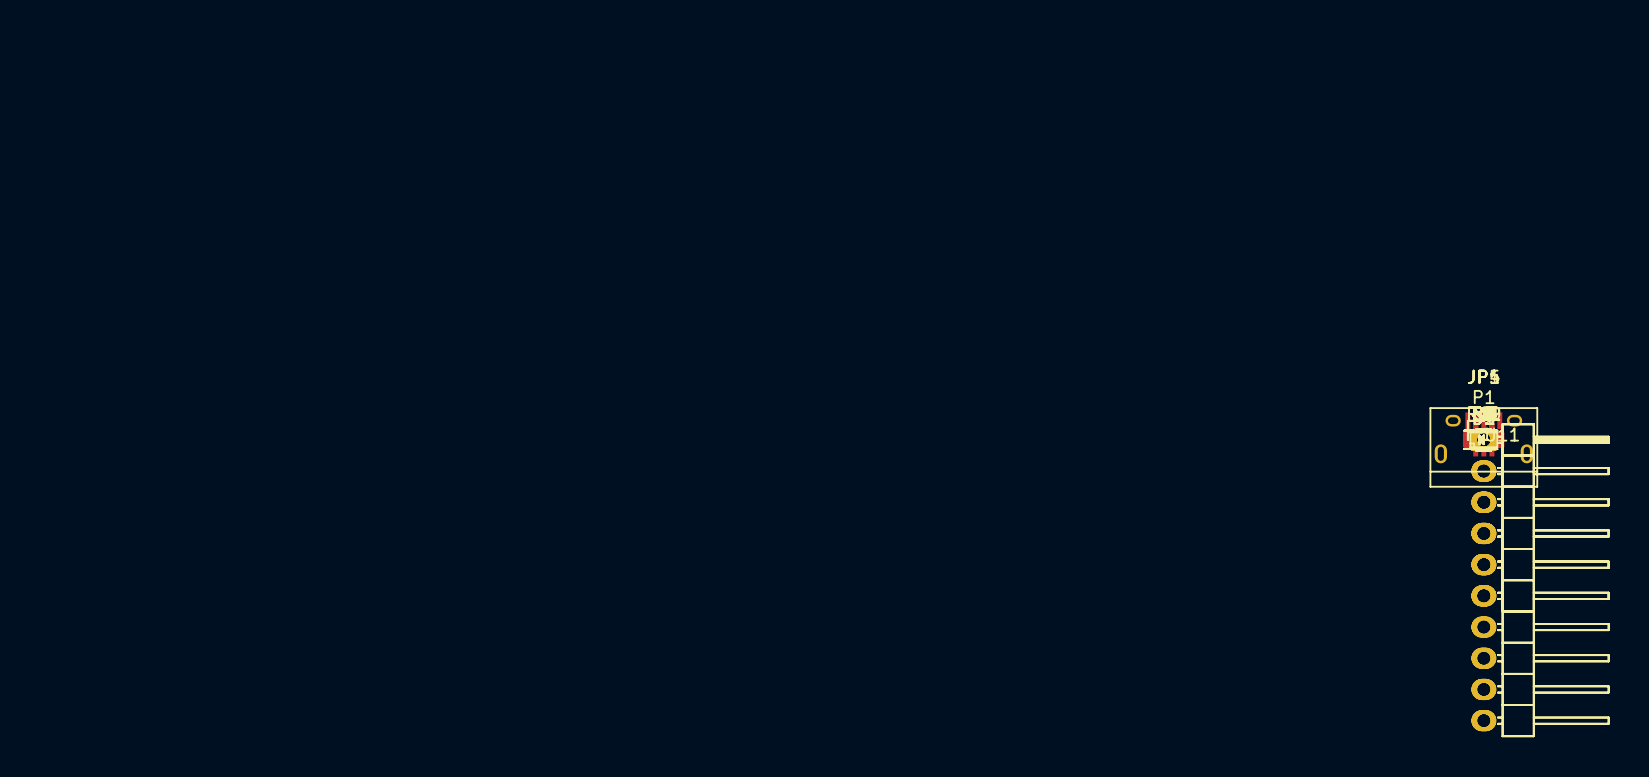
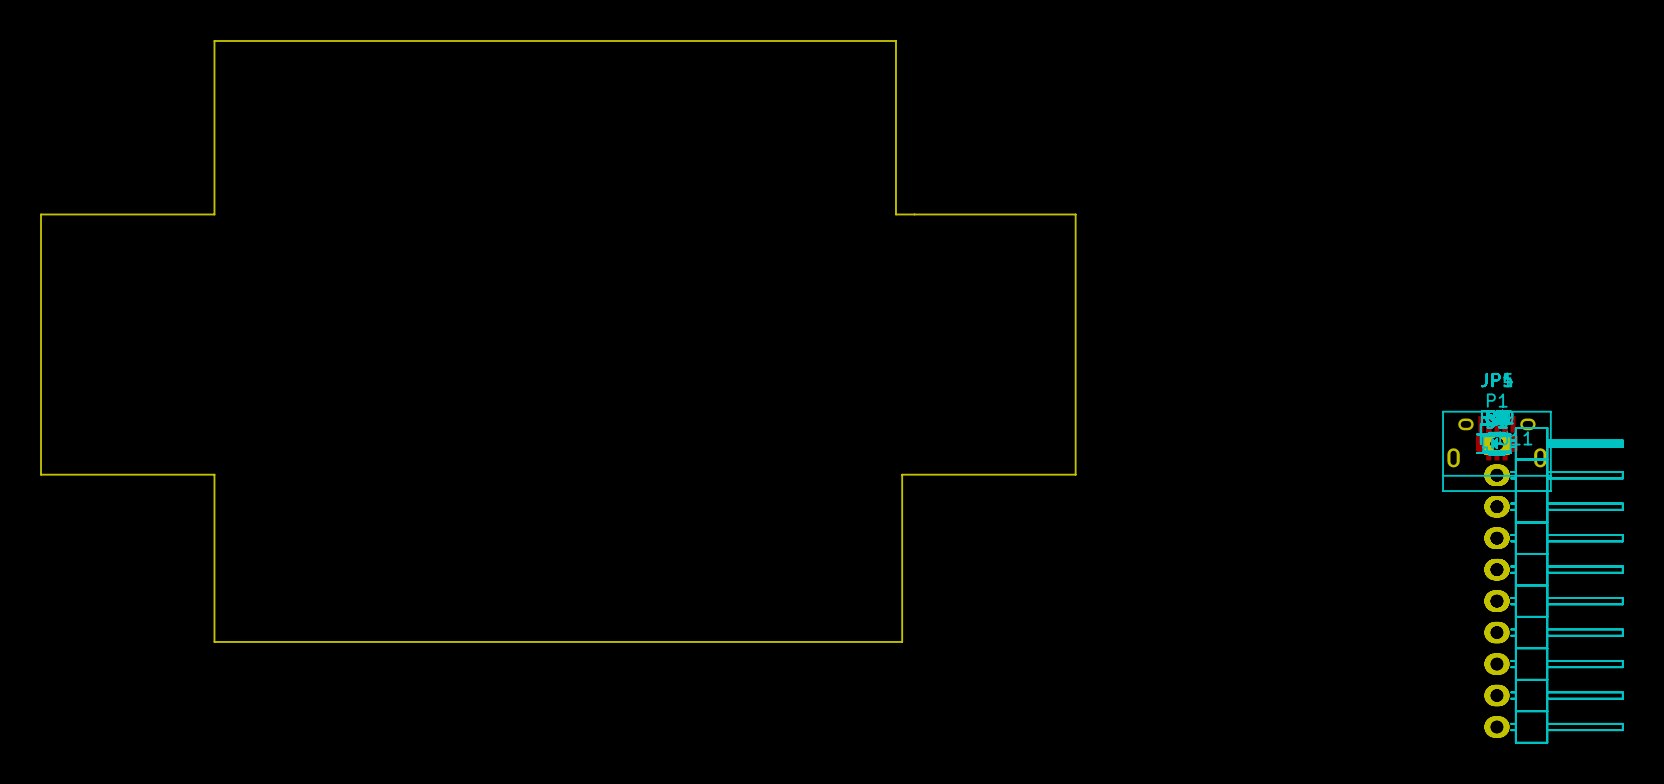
board edge: none -> (214, 41) (895, 41) (895, 214) (1075, 214) (1075, 474) (902, 474) (902, 641) (214, 641) (214, 474) (41, 474) (41, 214) (214, 214) (214, 41)

